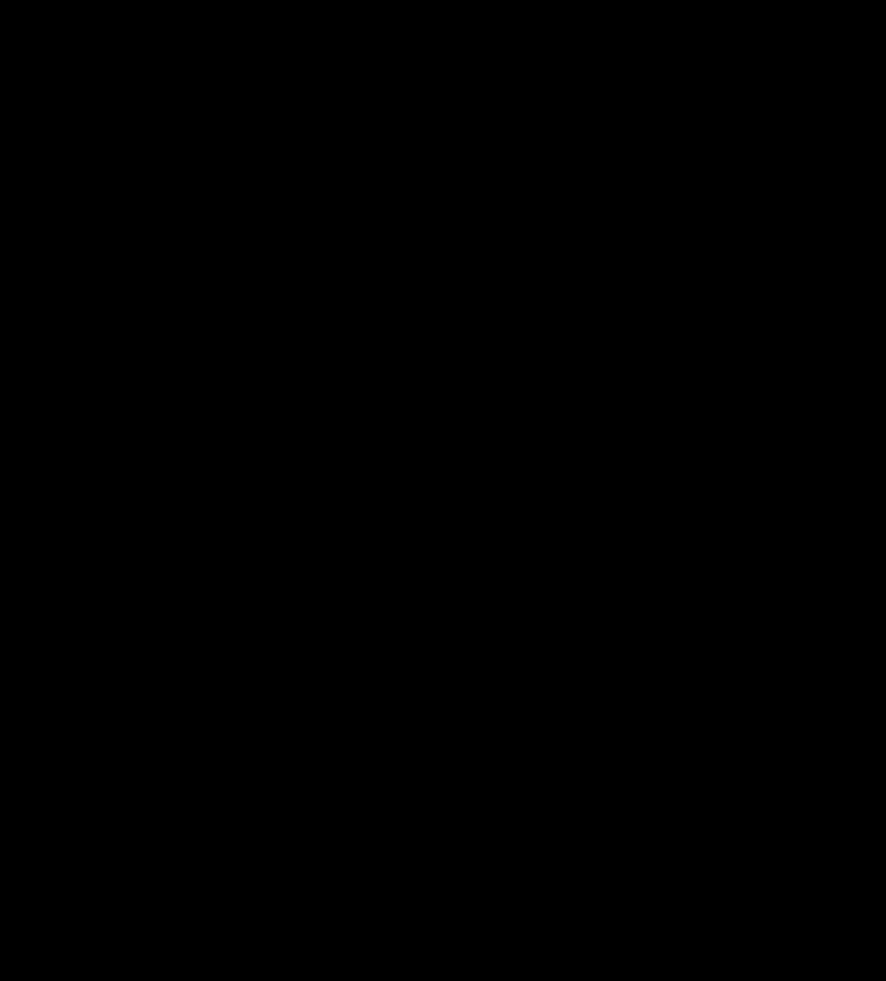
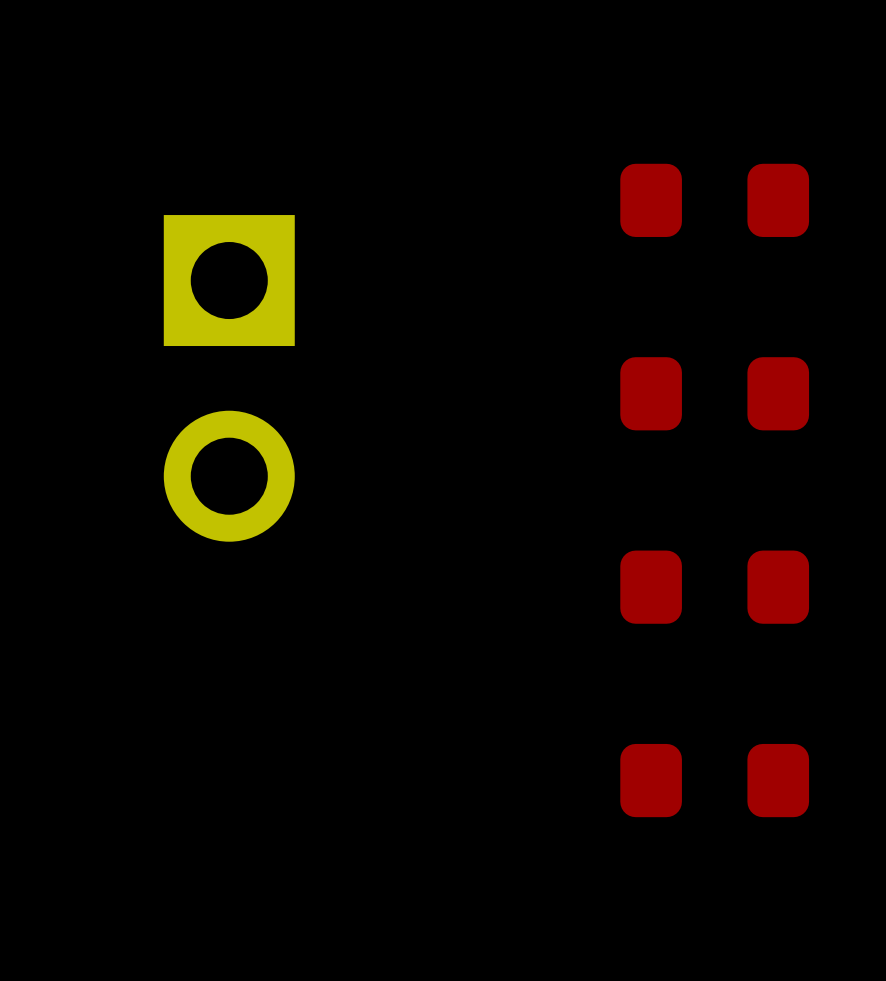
part: none -> (714, 200)
part: none -> (229, 378)
part: none -> (714, 393)
part: none -> (714, 587)
part: none -> (714, 780)

